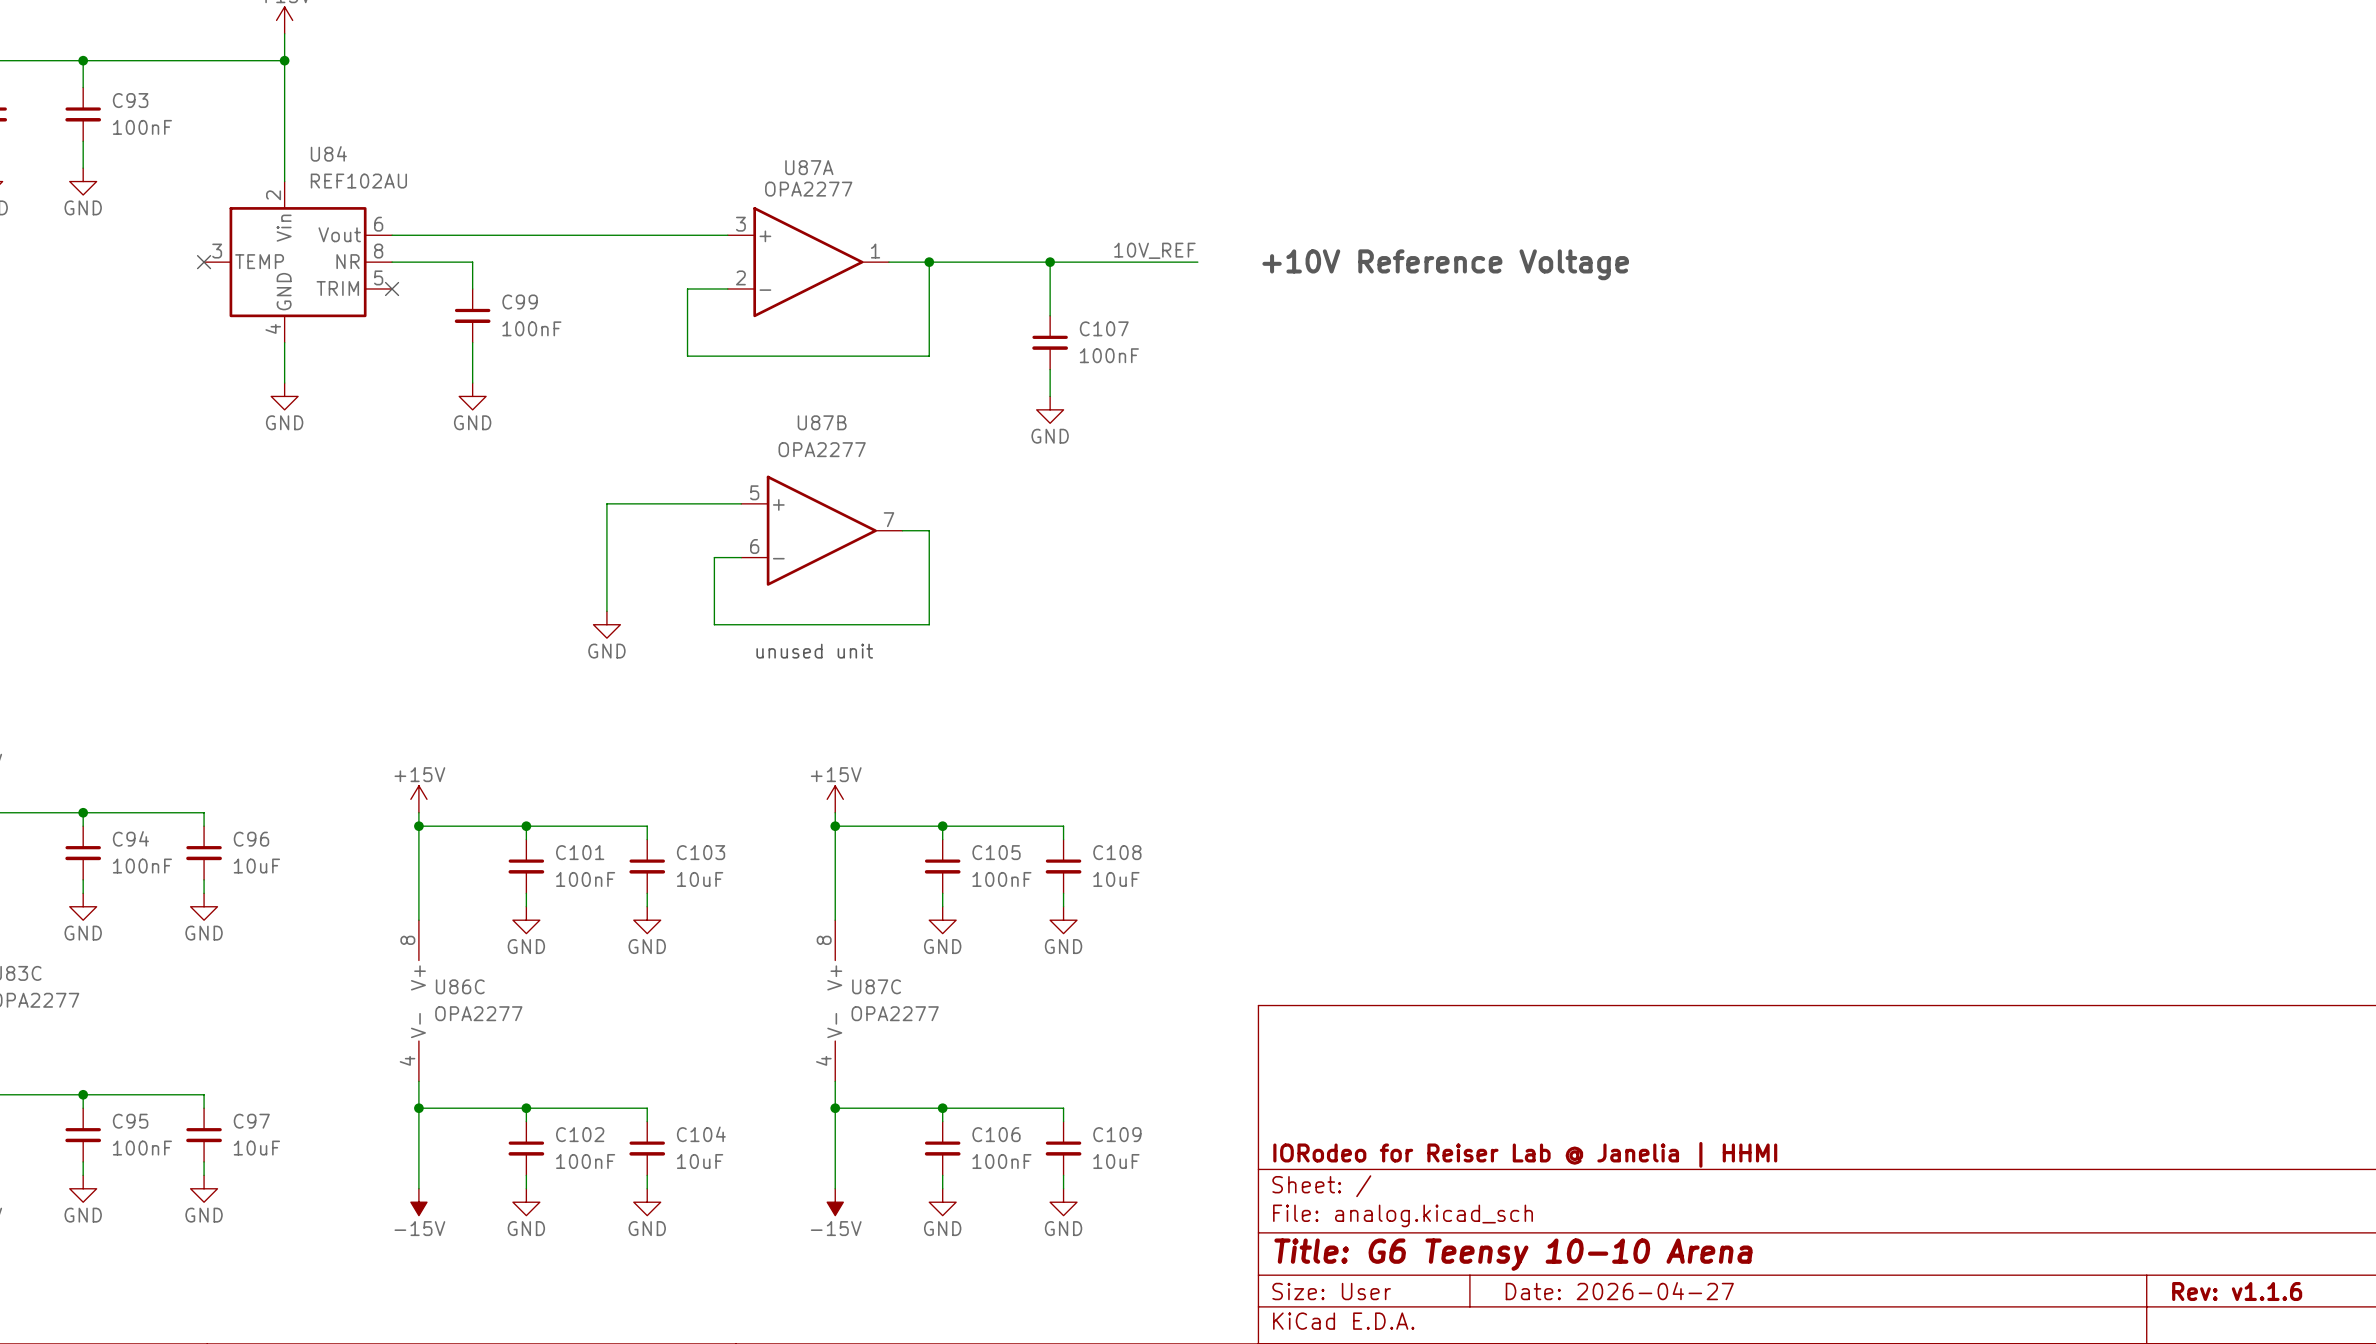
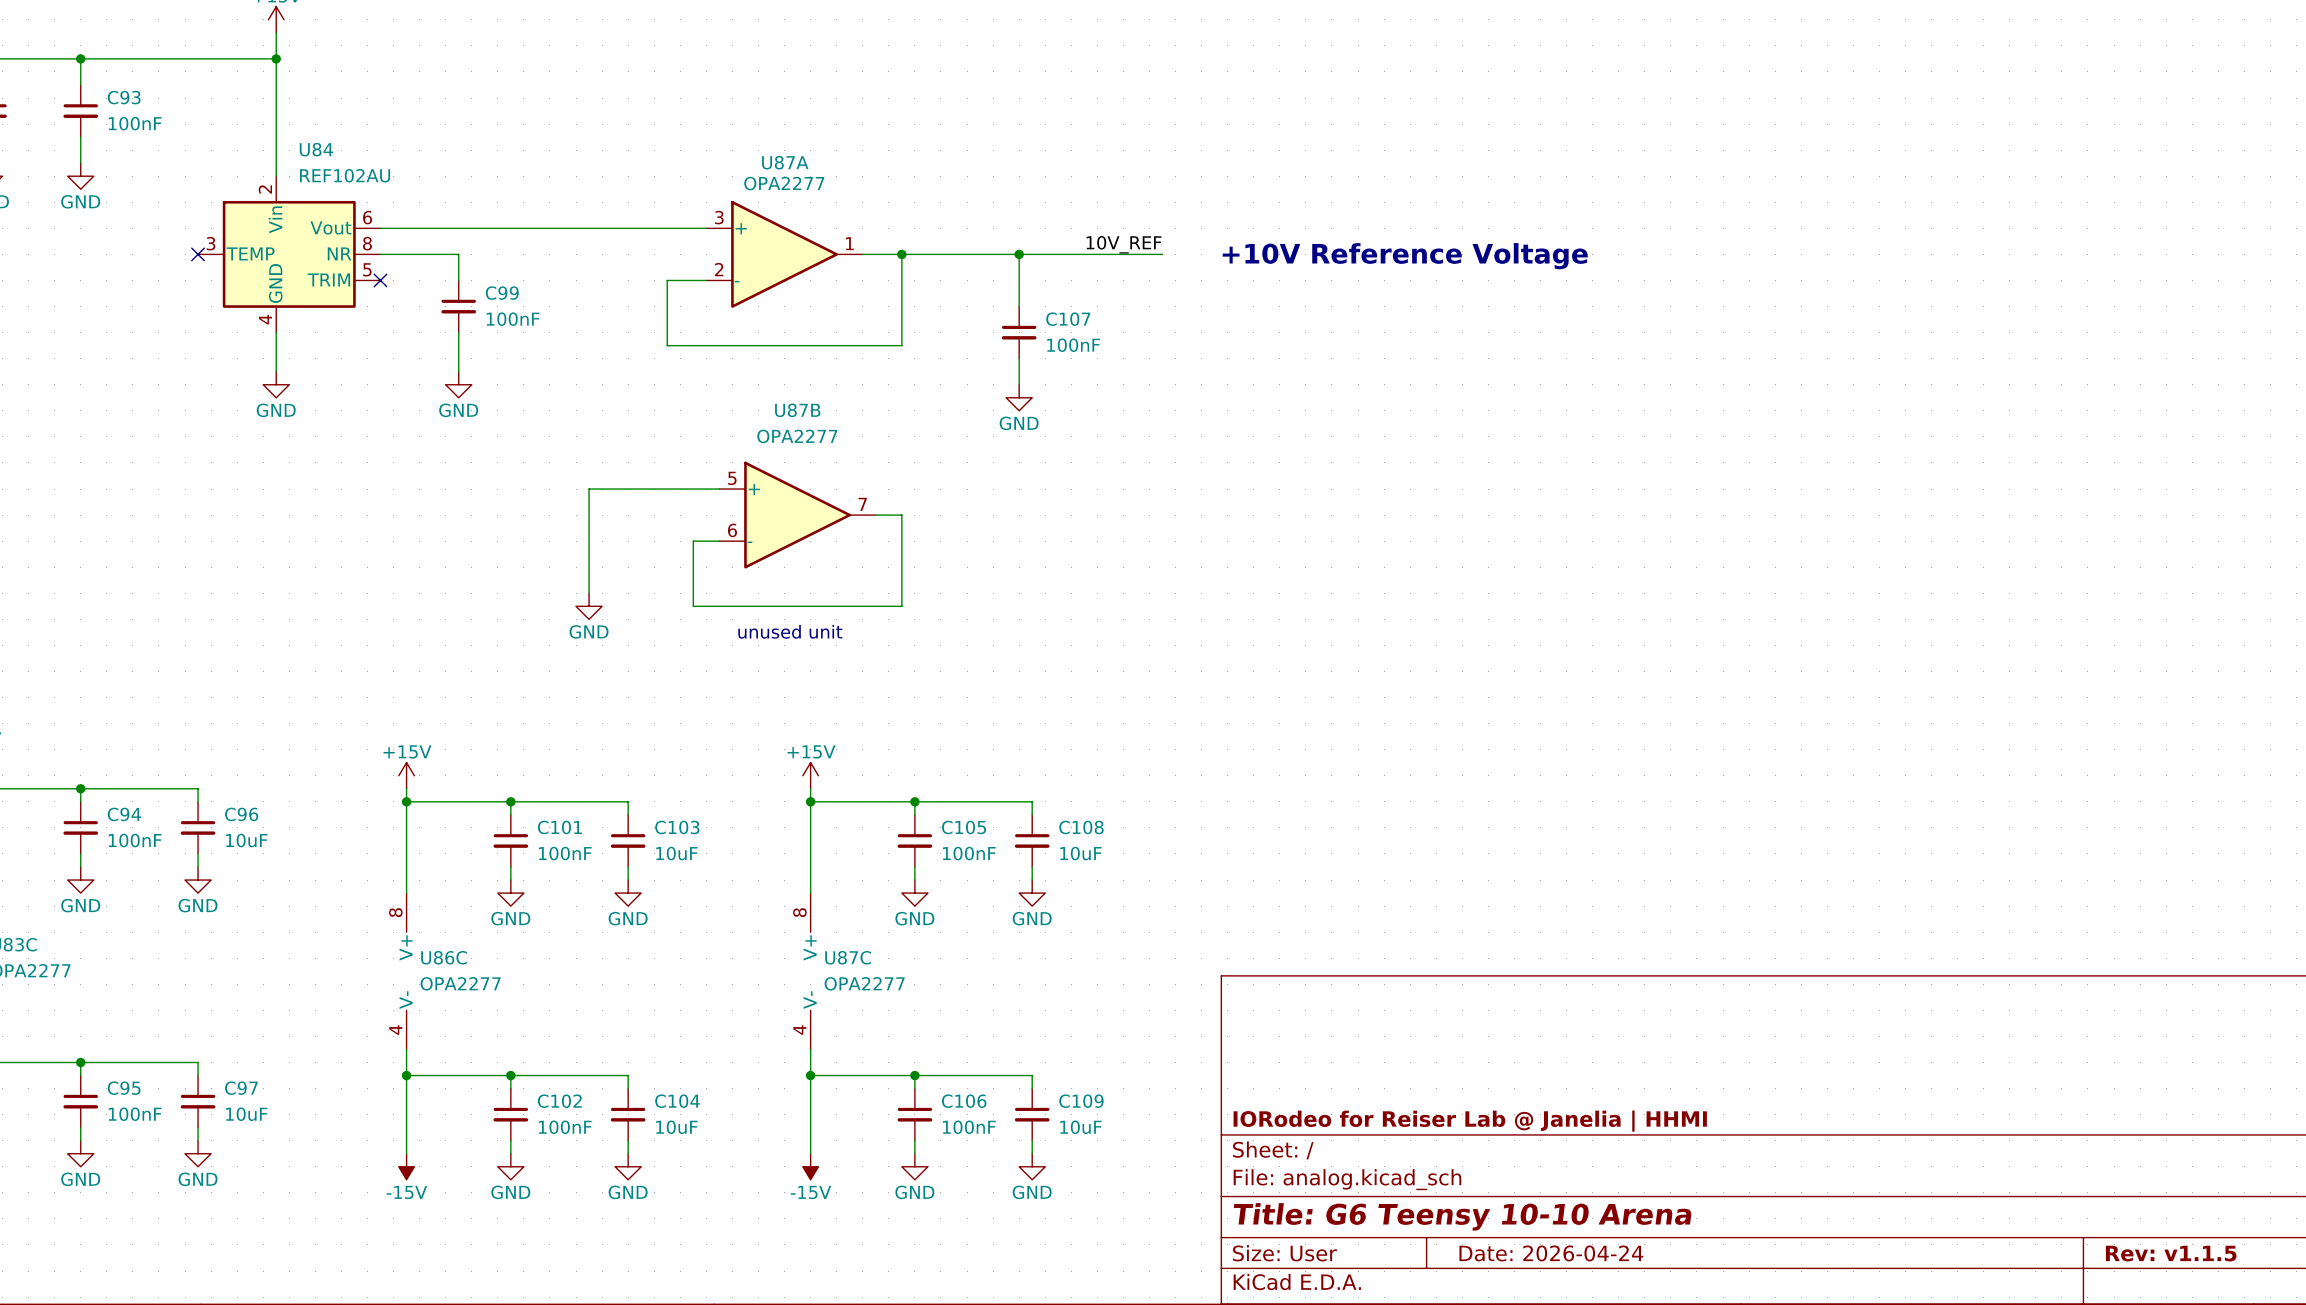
title block: Date: 2026-04-27 (1619, 1291) -> Date: 2026-04-24 (1551, 1253)
title block: Rev: v1.1.6 (2237, 1291) -> Rev: v1.1.5 (2171, 1253)

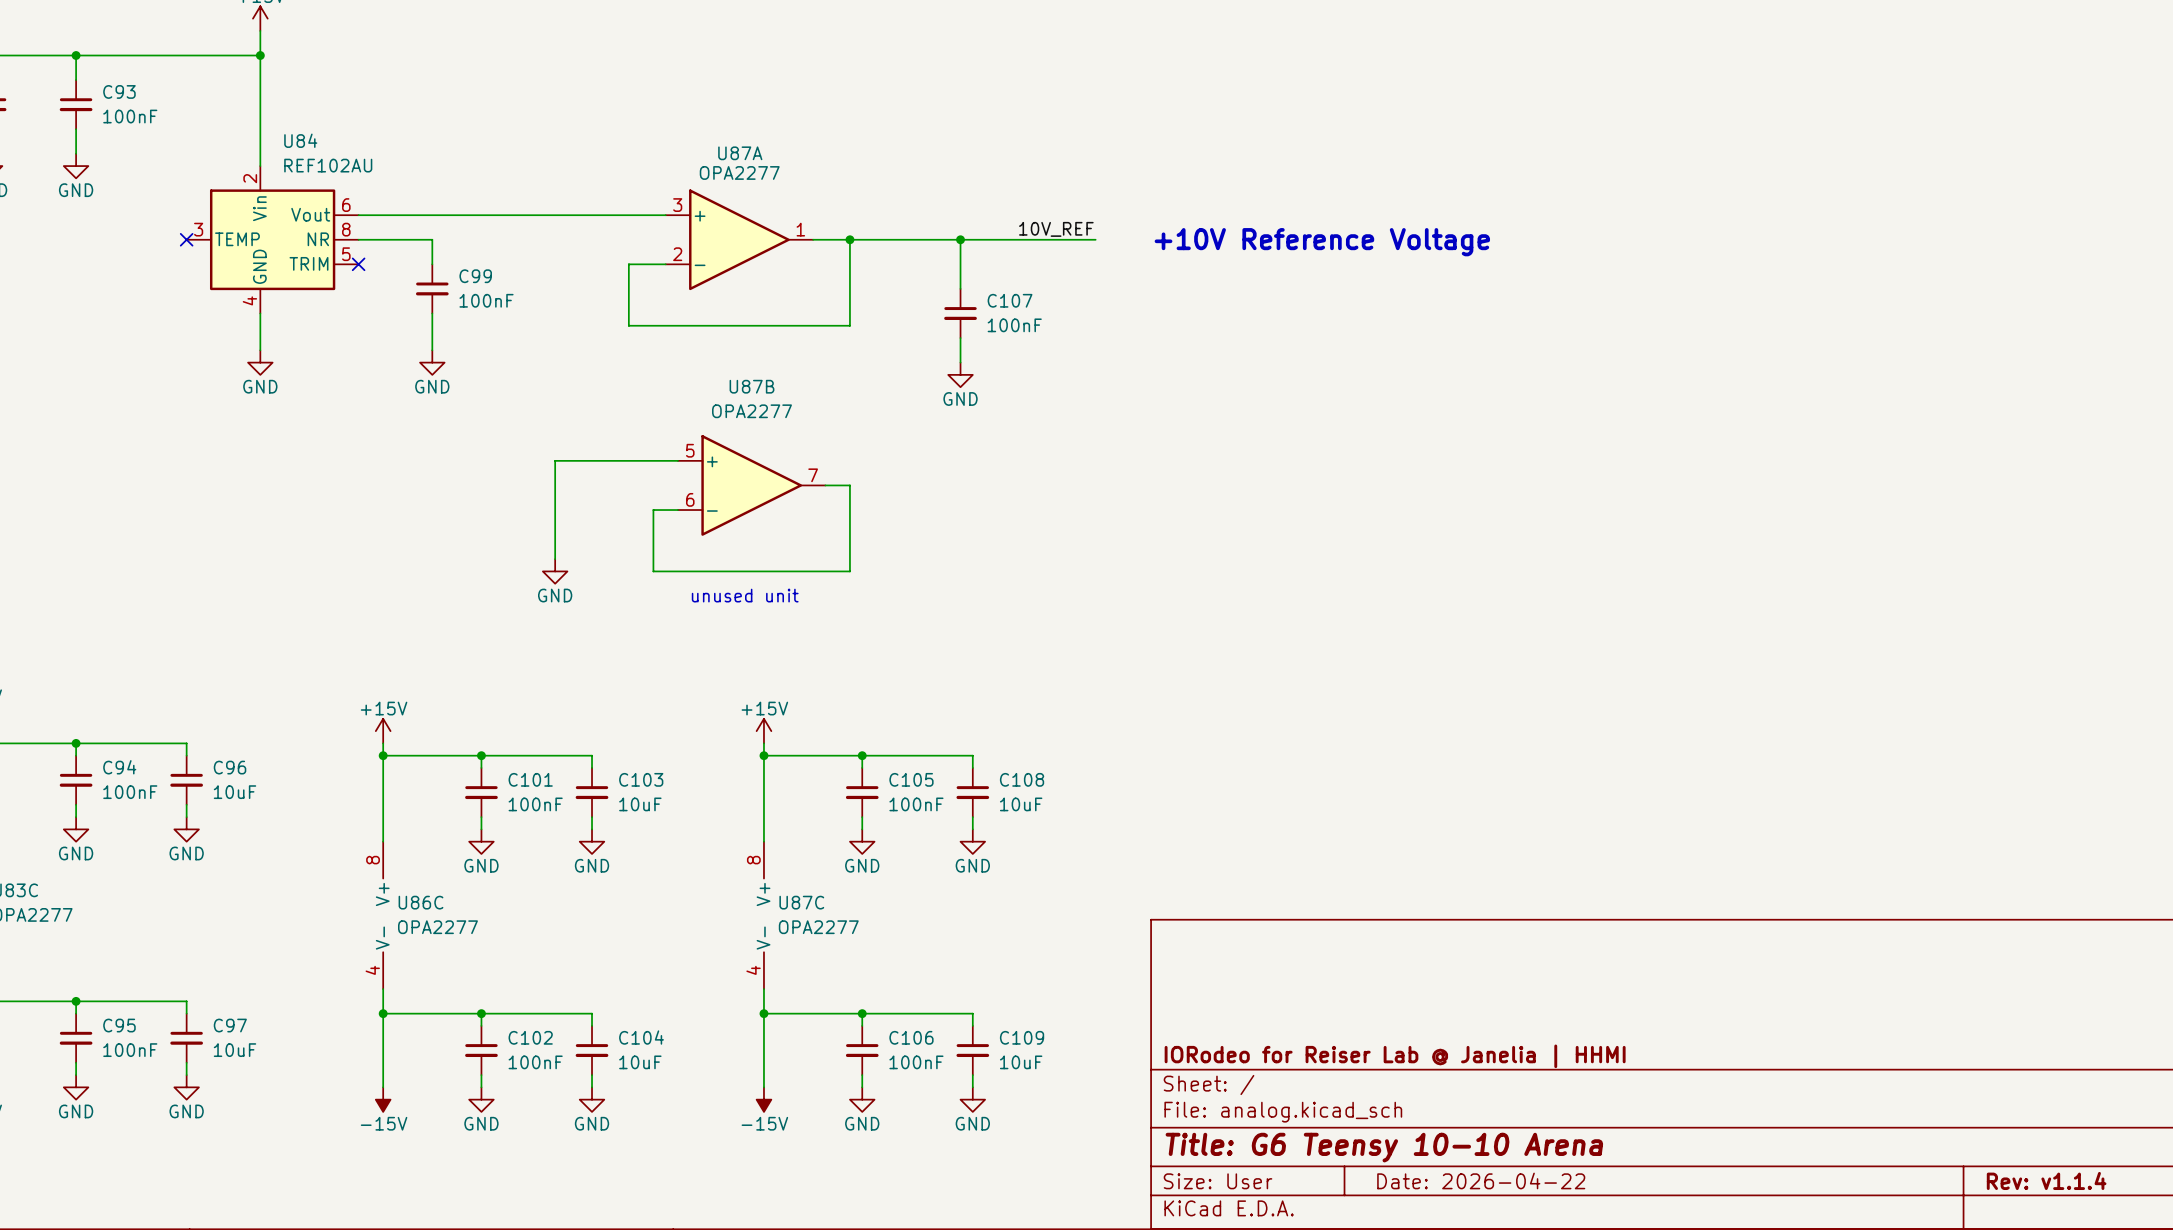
title block: Date: 2026-04-24 (1551, 1253) -> Date: 2026-04-22 (1481, 1180)
title block: Rev: v1.1.5 (2171, 1253) -> Rev: v1.1.4 (2046, 1180)

